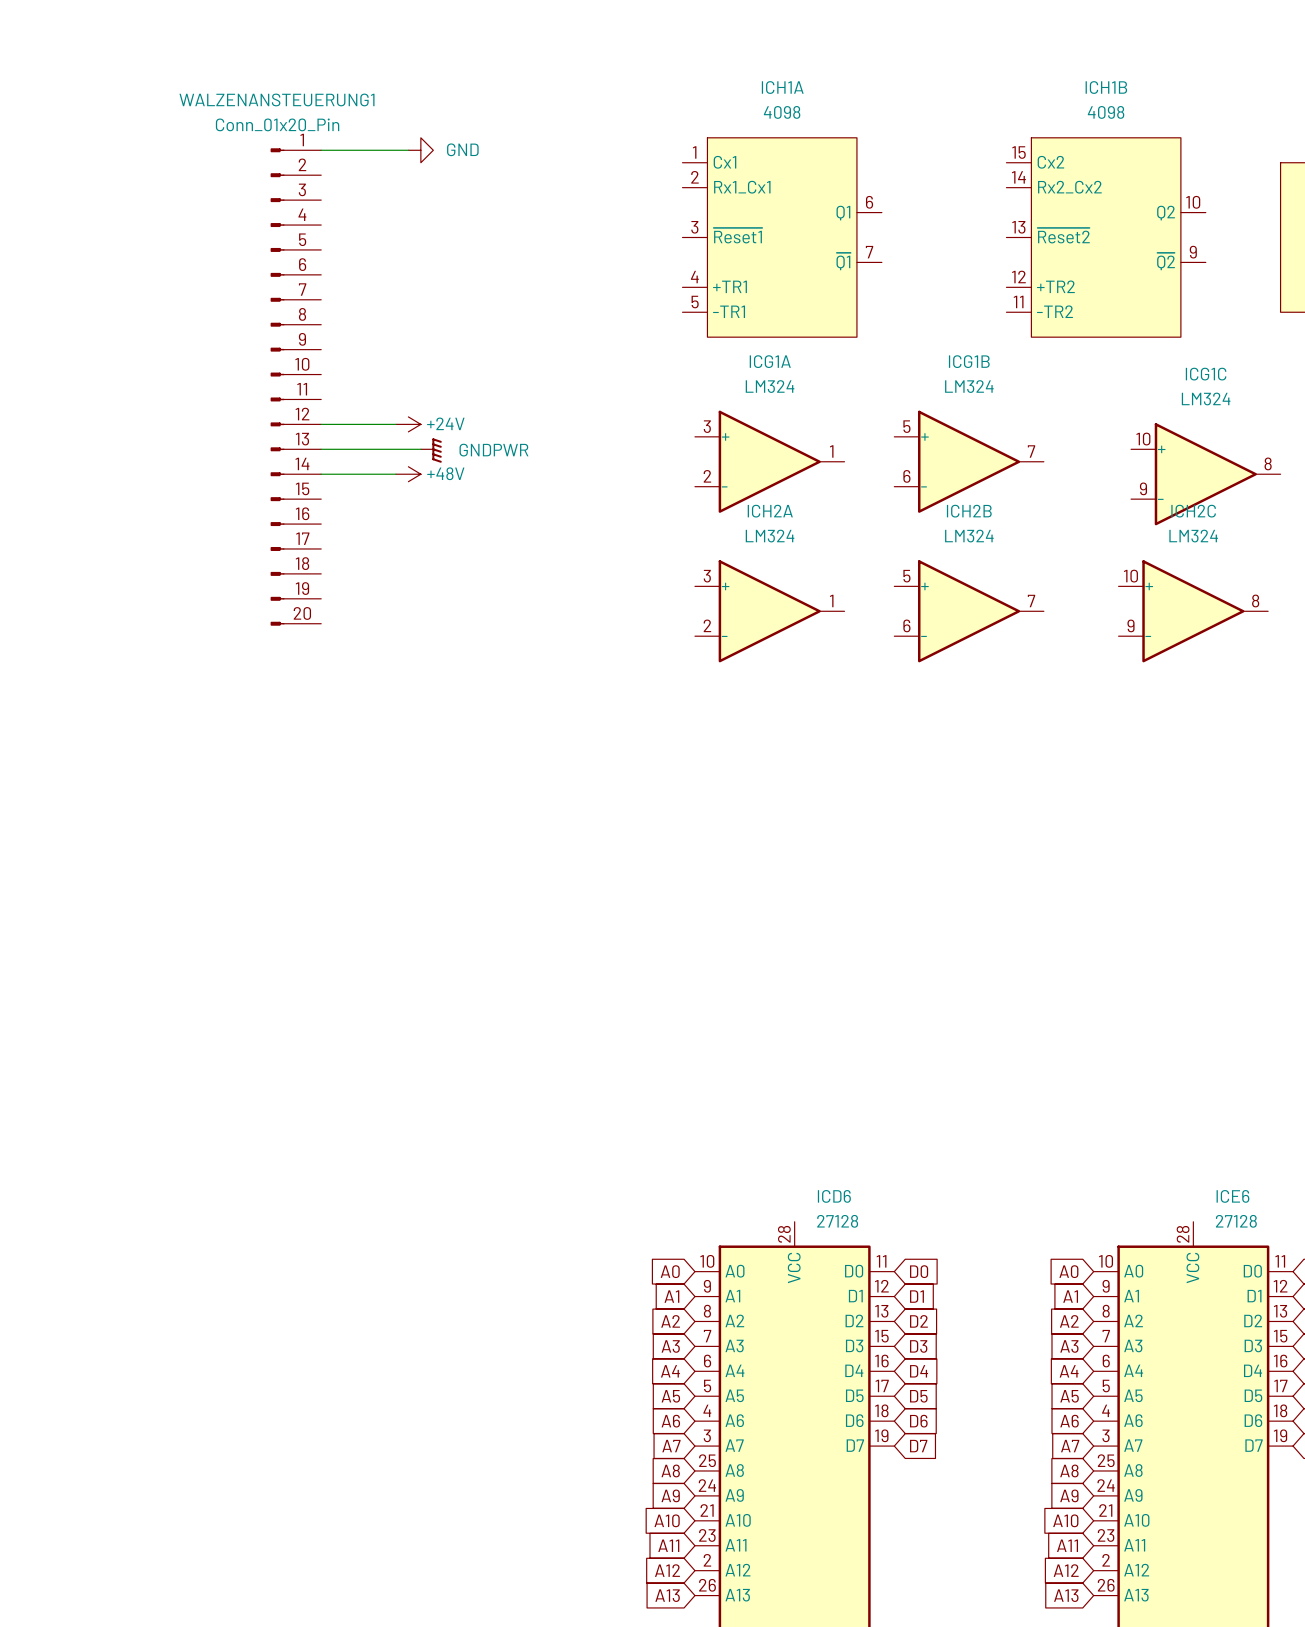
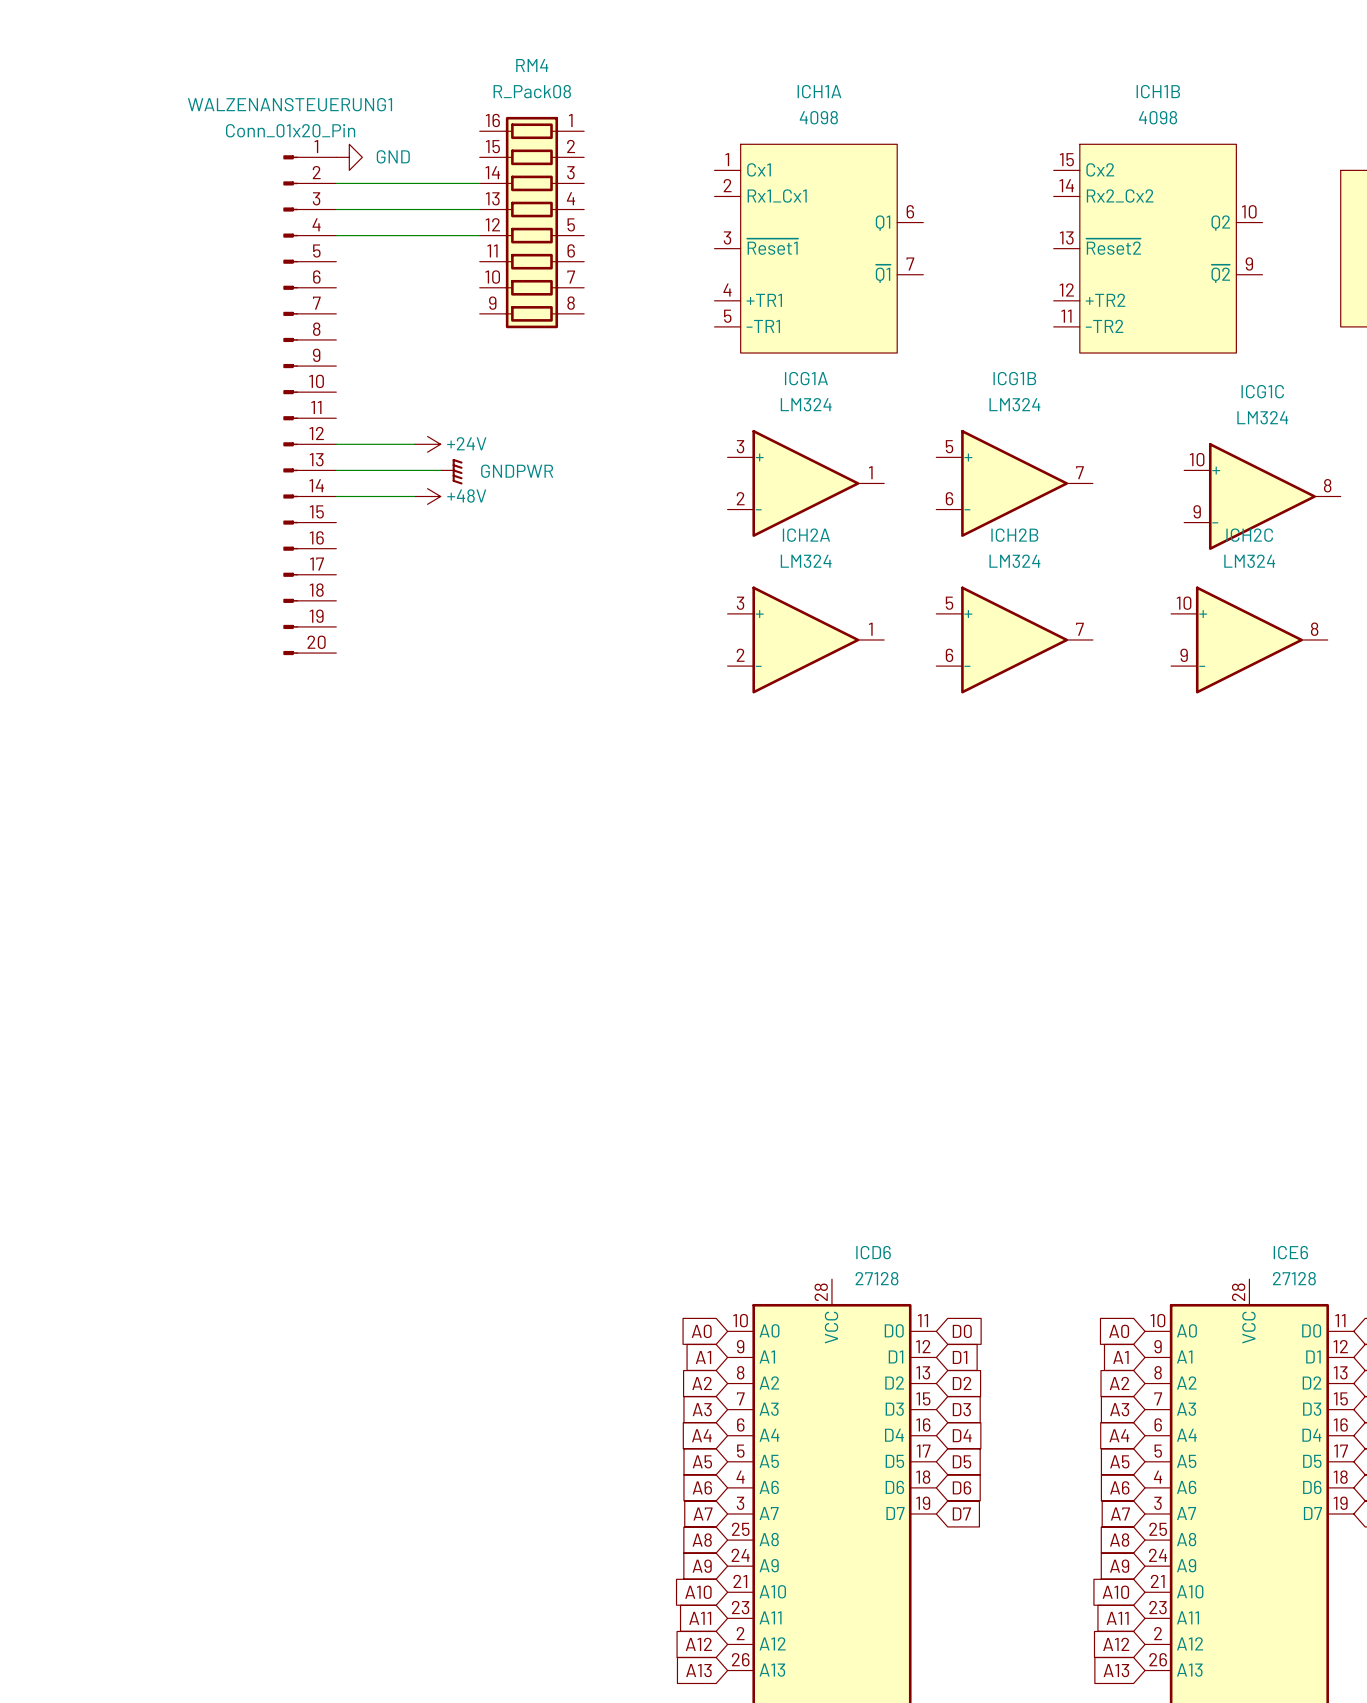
wire: (321, 150) (408, 150) -> none
power symbol position: GND (420, 150) -> GND (349, 157)
wire: none -> (336, 183) (479, 183)
wire: none -> (336, 209) (479, 209)
RM4: none -> R_Pack08 (531, 222)
wire: none -> (336, 235) (479, 235)

